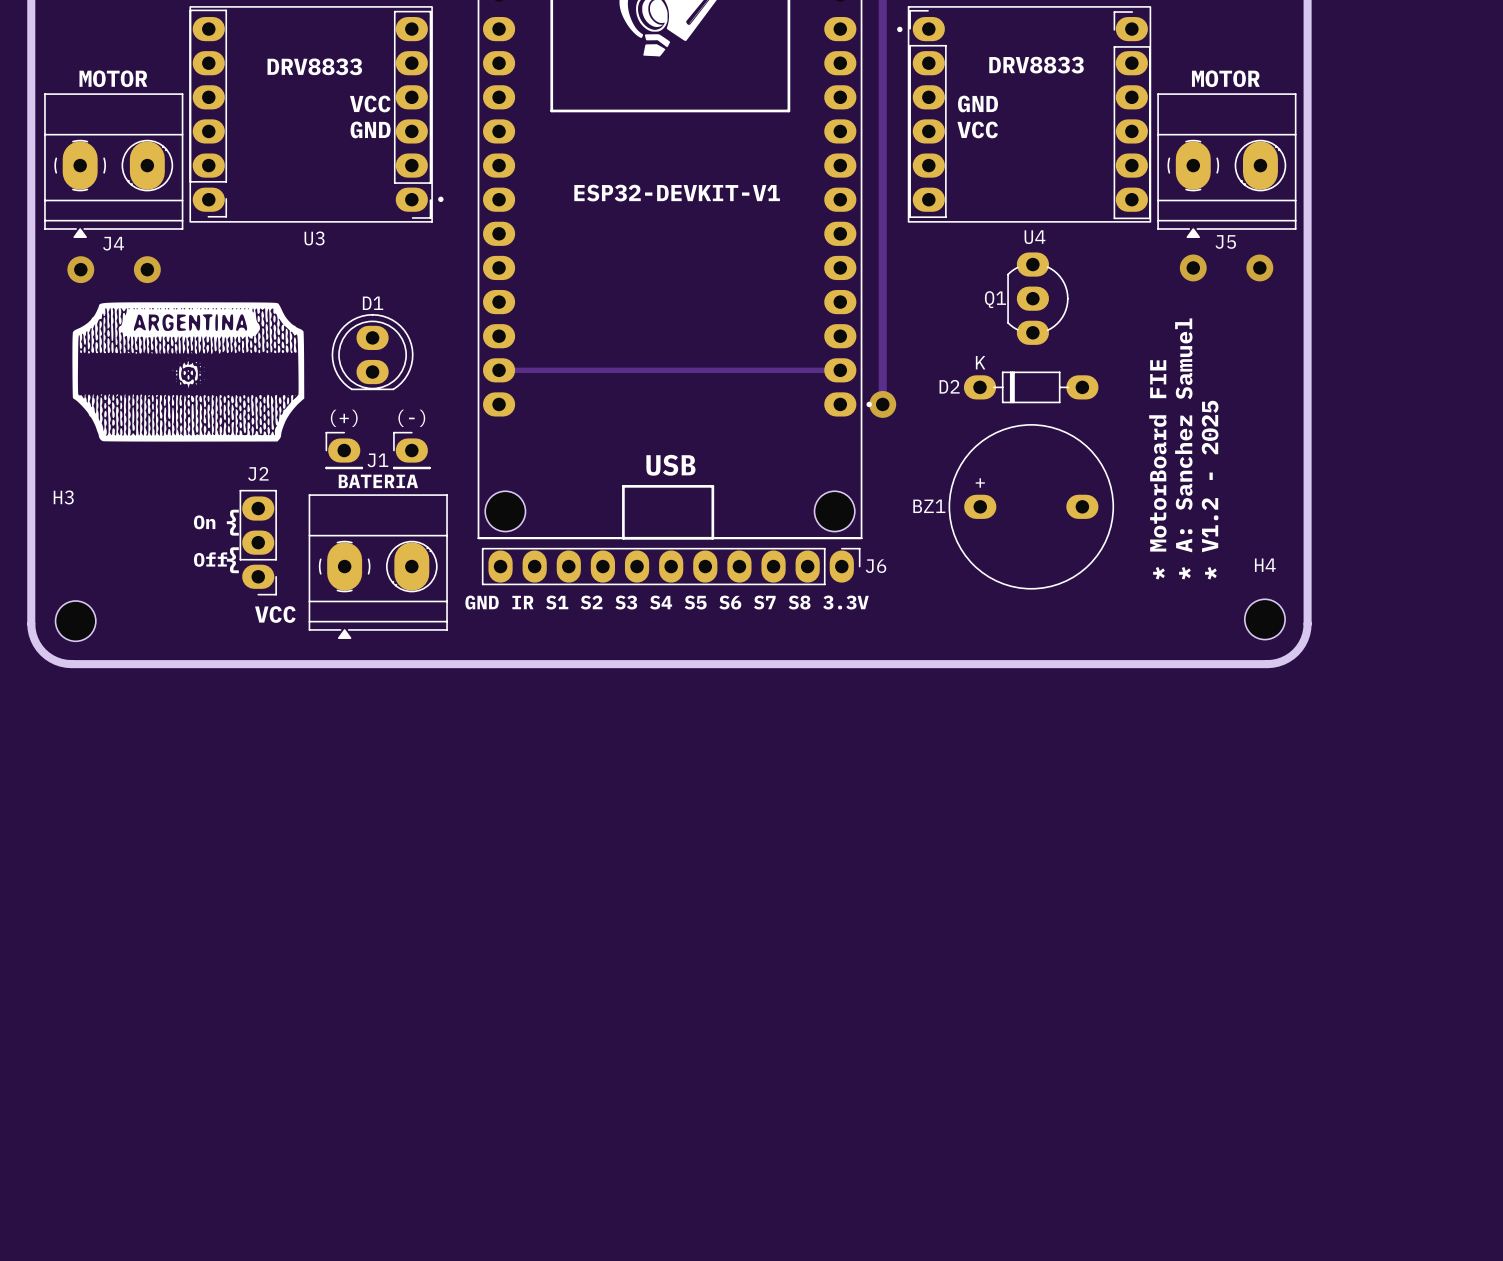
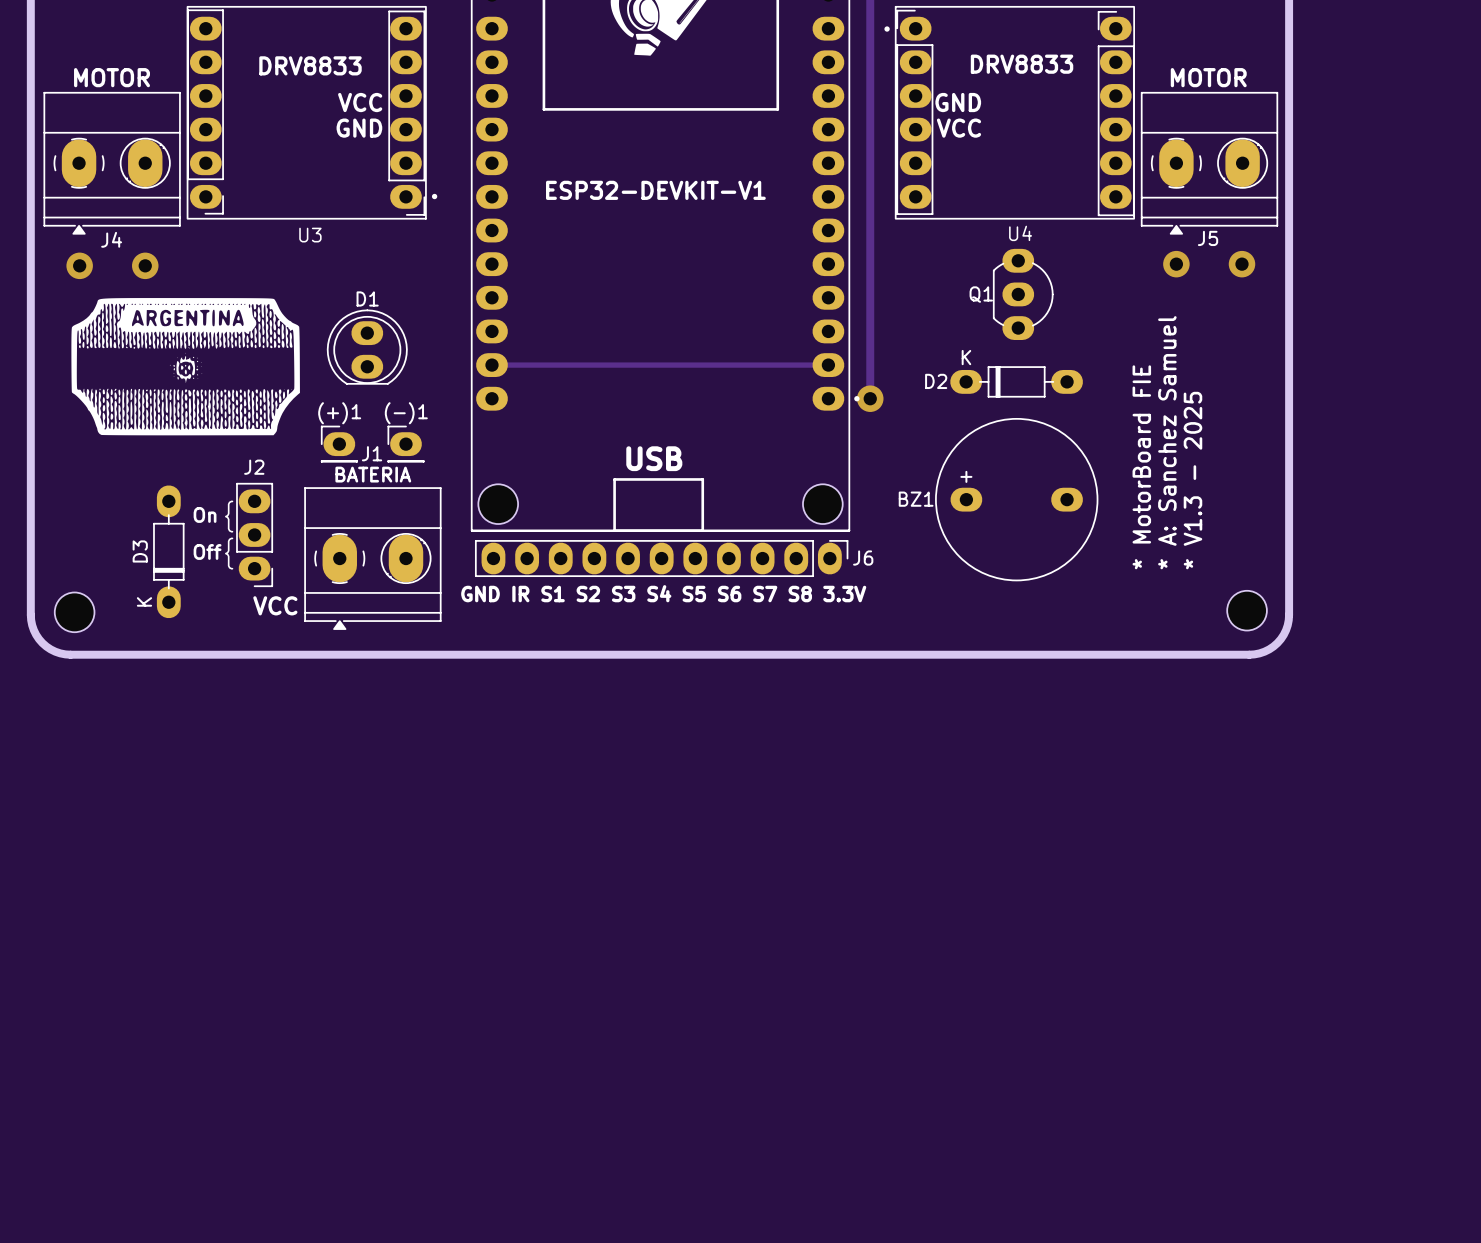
(+)1 name: (+) (344, 418) -> (+)1 (339, 413)
(-)1 name: (-) (411, 418) -> (-)1 (406, 413)
text: * V1.2 - 2025 (1210, 490) -> * V1.3 - 2025 (1192, 480)
H3 name: H3 (63, 497) -> none
D3: none -> (168, 551)
H4 name: H4 (1265, 565) -> none

